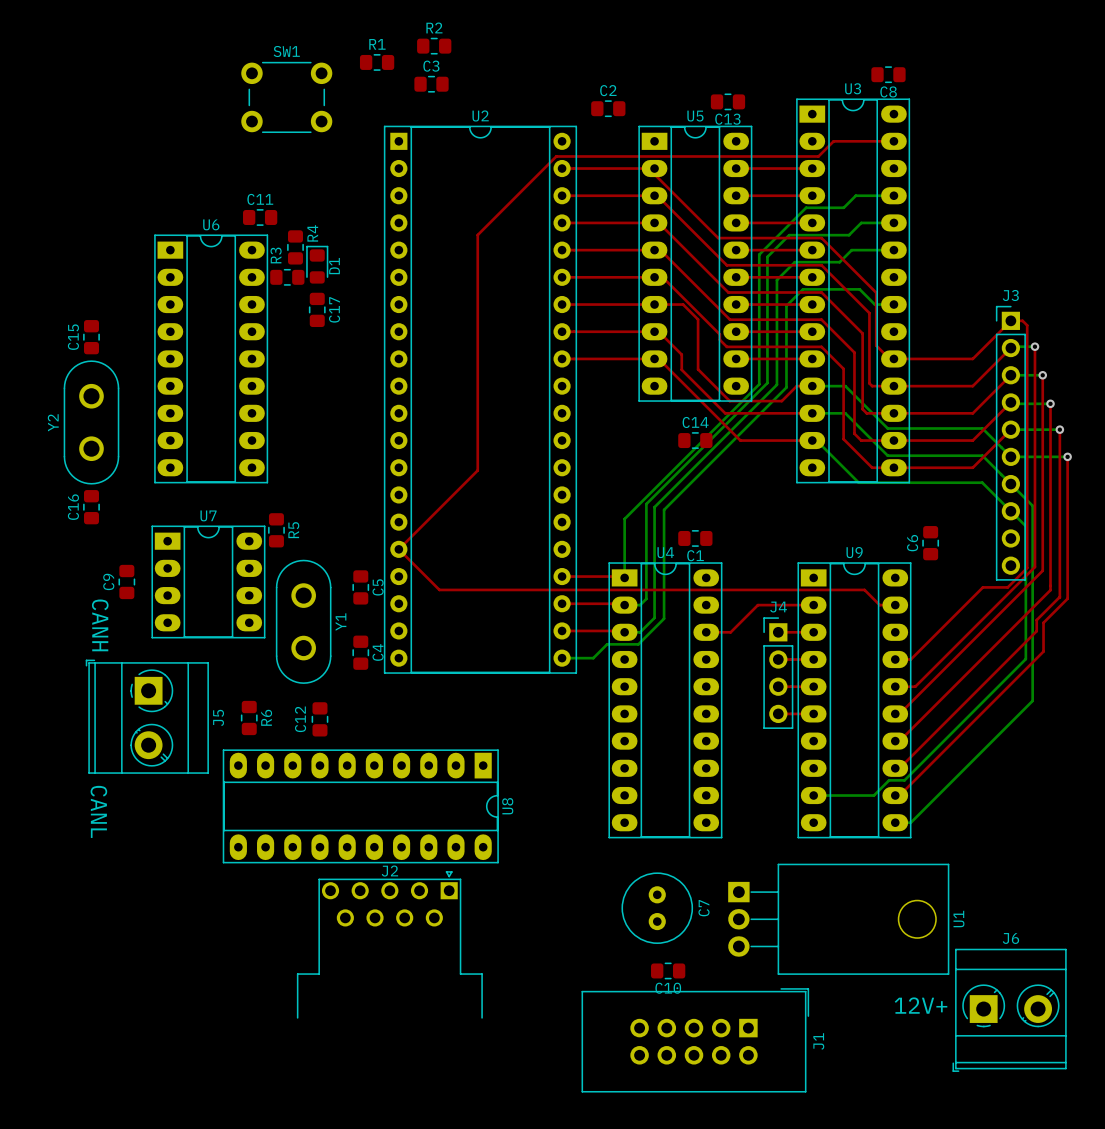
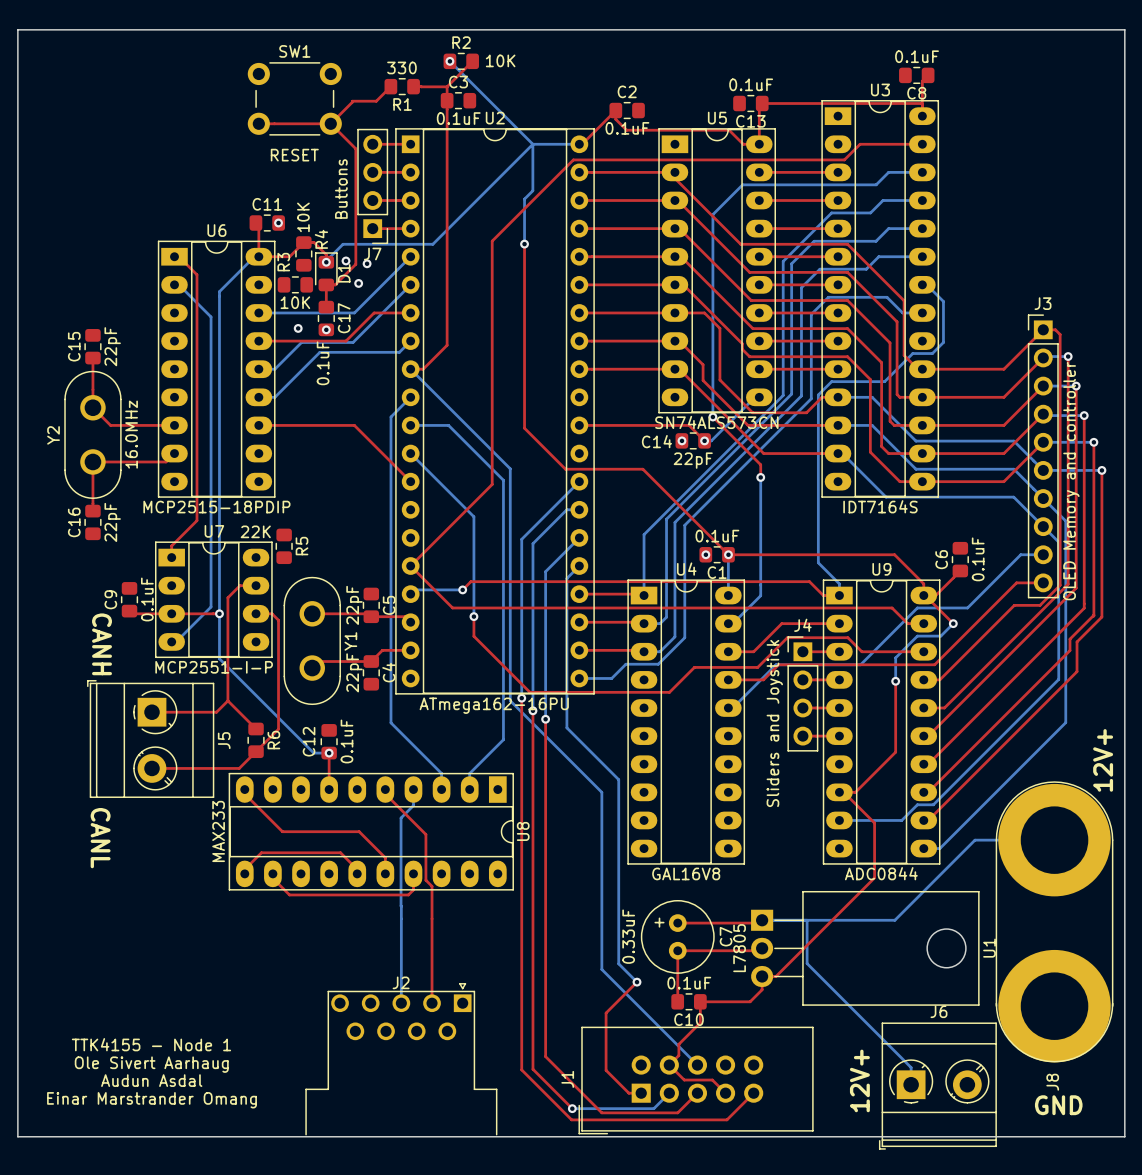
board edge: none -> (17, 29) (1124, 29) (1124, 1136) (17, 1136) (17, 29)
R1 name position: R1 (377, 44) -> R1 (402, 104)
R2 position: (434, 46) -> (461, 61)
C8 value: none -> 0.1uF (917, 56)
R2 value: none -> 10K (500, 60)
bottom track: none -> (449, 61) (532, 144)
via: none -> (449, 61)
top track: none -> (472, 61) (447, 86)
R1 position: (377, 62) -> (402, 86)
R1 value: none -> 330 (401, 67)
top track: none -> (928, 75) (922, 81) (922, 116)
C13 value: none -> 0.1uF (751, 84)
C3 position: (431, 84) -> (458, 100)
top track: none -> (390, 86) (376, 101) (352, 101) (330, 123)
top track: none -> (413, 86) (447, 86)
top track: none -> (447, 86) (447, 345) (423, 369) (410, 369)
top track: none -> (922, 104) (762, 103) (759, 106) (759, 144) (743, 144) (729, 130) (626, 130) (615, 119) (615, 110) (582, 144) (579, 144)
C3 value: none -> 0.1uF (458, 118)
top track: none -> (258, 123) (330, 123)
top track: none -> (330, 123) (355, 148) (355, 264) (335, 284) (326, 284) (326, 307)
C2 value: none -> 0.1uF (627, 128)
top track: none -> (372, 144) (410, 144)
bottom track: none -> (532, 144) (579, 144)
bottom track: none -> (532, 144) (432, 244) (342, 244) (326, 262)
bottom track: none -> (532, 144) (532, 190) (524, 199) (524, 244)
text: none -> RESET (294, 155)
top track: none -> (372, 172) (410, 172)
bottom track: none -> (922, 172) (888, 172) (876, 184) (742, 184) (712, 214) (712, 417)
J7: none -> (372, 186)
text: none -> Buttons (341, 188)
top track: none -> (372, 200) (410, 200)
R4 value: none -> 10K (303, 217)
top track: none -> (255, 223) (258, 225) (258, 256) (289, 256) (303, 242) (314, 242) (326, 254) (326, 262)
via: none -> (278, 223)
top track: none -> (372, 228) (410, 228)
top track: none -> (524, 244) (524, 428) (565, 469) (642, 469) (728, 554) (894, 554) (923, 583) (923, 595) (935, 595) (960, 570)
via: none -> (524, 244)
top track: none -> (174, 256) (178, 256) (196, 274) (196, 520) (171, 545) (171, 557)
bottom track: none -> (258, 256) (254, 256) (219, 291) (219, 658) (313, 753) (329, 753)
bottom track: none -> (410, 256) (354, 312) (258, 312)
via: none -> (346, 260)
via: none -> (326, 262)
via: none -> (367, 263)
via: none -> (358, 283)
bottom track: none -> (174, 284) (178, 284) (211, 316) (211, 606) (176, 641) (171, 641)
bottom track: none -> (410, 284) (353, 342) (301, 342) (274, 369) (258, 369)
bottom track: none -> (922, 284) (926, 284) (943, 301) (943, 342) (932, 353) (912, 353) (884, 381) (831, 381) (818, 394) (818, 562) (839, 583) (839, 595)
R3 value: none -> 10K (295, 302)
top track: none -> (410, 312) (374, 312) (346, 341) (258, 341)
via: none -> (298, 328)
via: none -> (326, 329)
bottom track: none -> (410, 341) (399, 352) (319, 352) (274, 397) (258, 397)
C15 value: none -> 22pF (112, 346)
top track: none -> (92, 358) (92, 407) (110, 425) (174, 425)
C17 value: none -> 0.1uF (323, 363)
bottom track: none -> (410, 369) (510, 468) (510, 700) (601, 792) (601, 969) (697, 1065)
bottom track: none -> (410, 397) (390, 417) (390, 722) (441, 773) (441, 789)
bottom track: none -> (759, 397) (754, 397) (711, 440) (704, 440)
top track: none -> (712, 417) (760, 464) (760, 477)
via: none -> (712, 417)
U5 value: none -> SN74ALS573CN (716, 422)
top track: none -> (258, 425) (354, 425) (410, 481)
bottom track: none -> (410, 425) (448, 425) (503, 480) (503, 739) (469, 773) (469, 789)
top track: none -> (579, 425) (689, 425) (704, 440)
Y2 value: none -> 16.0MHz (131, 434)
C14 name position: C14 (695, 422) -> C14 (656, 441)
via: none -> (681, 440)
via: none -> (704, 440)
top track: none -> (174, 453) (166, 461) (92, 461) (92, 511)
bottom track: none -> (410, 453) (473, 516) (473, 616)
C14 position: (695, 440) -> (693, 440)
C14 value: none -> 22pF (693, 460)
bottom track: none -> (760, 477) (760, 595) (732, 623) (728, 623)
via: none -> (760, 477)
bottom track: none -> (579, 481) (521, 539) (521, 698)
text: none -> OLED Memory and controller (1071, 481)
U6 value: none -> MCP2515-18PDIP (216, 507)
U3 value: none -> IDT7164S (880, 506)
bottom track: none -> (579, 509) (566, 509) (532, 543) (532, 710)
C16 value: none -> 22pF (112, 522)
R5 value: none -> 22K (255, 531)
C1 value: none -> 0.1uF (717, 536)
bottom track: none -> (579, 537) (545, 571) (545, 719)
via: none -> (705, 554)
bottom track: none -> (728, 554) (728, 595)
via: none -> (728, 554)
bottom track: none -> (1043, 554) (1020, 554) (967, 607) (917, 607) (860, 664) (776, 664) (732, 708) (728, 708)
C6 value: none -> 0.1uF (978, 559)
bottom track: none -> (579, 566) (566, 578) (566, 727) (618, 779) (618, 963) (637, 982)
top track: none -> (1043, 582) (1016, 582) (934, 664) (778, 664) (763, 679) (728, 679)
top track: none -> (256, 585) (239, 585) (227, 597) (227, 700)
top track: none -> (462, 589) (470, 581) (809, 581) (823, 595) (839, 595)
bottom track: none -> (462, 589) (414, 589) (410, 594)
via: none -> (462, 589)
top track: none -> (925, 595) (953, 623)
C9 value: none -> 0.1uF (147, 599)
C5 value: none -> 22pF (354, 605)
top track: none -> (129, 611) (132, 613) (219, 613)
via: none -> (219, 613)
top track: none -> (256, 613) (272, 613) (278, 620) (278, 729) (239, 768) (152, 768)
top track: none -> (312, 613) (368, 613) (371, 616) (405, 616) (410, 622)
top track: none -> (473, 616) (473, 636) (529, 692) (669, 692) (694, 667) (757, 667) (787, 637) (847, 637) (861, 651) (923, 651)
via: none -> (473, 616)
bottom track: none -> (953, 623) (940, 636) (917, 636) (895, 657) (895, 681)
via: none -> (953, 623)
top track: none -> (410, 650) (382, 650) (371, 661) (318, 661) (312, 668)
U7 value: none -> MCP2551-I-P (214, 667)
C4 value: none -> 22pF (354, 672)
top track: none -> (895, 681) (895, 752) (855, 792) (839, 792)
via: none -> (895, 681)
top track: none -> (521, 698) (521, 1069) (571, 1119) (726, 1119) (753, 1093)
via: none -> (521, 698)
top track: none -> (227, 700) (256, 728)
top track: none -> (227, 700) (216, 712) (152, 712)
U2 value: none -> ATmega162-16PU (494, 705)
top track: none -> (532, 710) (532, 1069) (572, 1108)
via: none -> (532, 710)
top track: none -> (545, 719) (545, 1056) (601, 1112) (677, 1112) (697, 1093)
via: none -> (545, 719)
text: none -> Sliders and Joystick (774, 723)
C12 value: none -> 0.1uF (346, 741)
top track: none -> (329, 753) (329, 789)
via: none -> (329, 753)
text: none -> 12V+ (1103, 760)
top track: none -> (244, 789) (244, 793) (282, 831) (359, 831) (385, 857) (385, 873)
top track: none -> (385, 789) (385, 793) (425, 834) (425, 880) (432, 886) (432, 1003)
bottom track: none -> (413, 789) (413, 805) (401, 818) (401, 1003)
top track: none -> (843, 792) (874, 823) (874, 877) (775, 976) (762, 976) (762, 989) (750, 1001) (700, 1001) (700, 1022) (678, 1044) (678, 1055) (669, 1065) (684, 1080) (712, 1080) (725, 1093)
U8 value: none -> MAX233 (218, 831)
bottom track: none -> (1054, 840) (975, 840) (894, 920) (762, 920)
top track: none -> (244, 873) (244, 869) (261, 852) (340, 852) (357, 869) (357, 873)
top track: none -> (272, 873) (272, 878) (289, 894) (408, 894) (413, 889) (413, 873)
U4 value: none -> GAL16V8 (686, 873)
U9 value: none -> ADC0844 (881, 873)
top track: none -> (762, 920) (759, 923) (677, 923)
bottom track: none -> (807, 920) (807, 963) (911, 1067) (911, 1084)
text: none -> + (659, 922)
J8: none -> (1054, 921)
C7 value: none -> 0.33uF (628, 936)
U1 value: none -> L7805 (739, 948)
top track: none -> (762, 948) (759, 950) (677, 950) (677, 1001)
J2 position: (389, 944) -> (401, 1059)
top track: none -> (637, 982) (606, 1013) (606, 1070) (628, 1093) (641, 1093)
via: none -> (637, 982)
C10 value: none -> 0.1uF (689, 983)
text rotation: 0° (921, 1005) -> 90° counterclockwise (859, 1080)
text position: 12V+ (921, 1005) -> 12V+ (859, 1080)
J6 position: (1009, 1010) -> (937, 1086)
text: none -> TTK4155 - Node 1 (151, 1044)
text: none -> Ole Sivert Aarhaug (151, 1064)
J1 rotation: 0° (695, 1040) -> 180° (696, 1080)
text: none -> Audun Asdal (151, 1080)
bottom track: none -> (669, 1093) (653, 1108) (572, 1108)
text: none -> Einar Marstrander Omang (152, 1100)
text: none -> GND (1058, 1105)
via: none -> (572, 1108)

